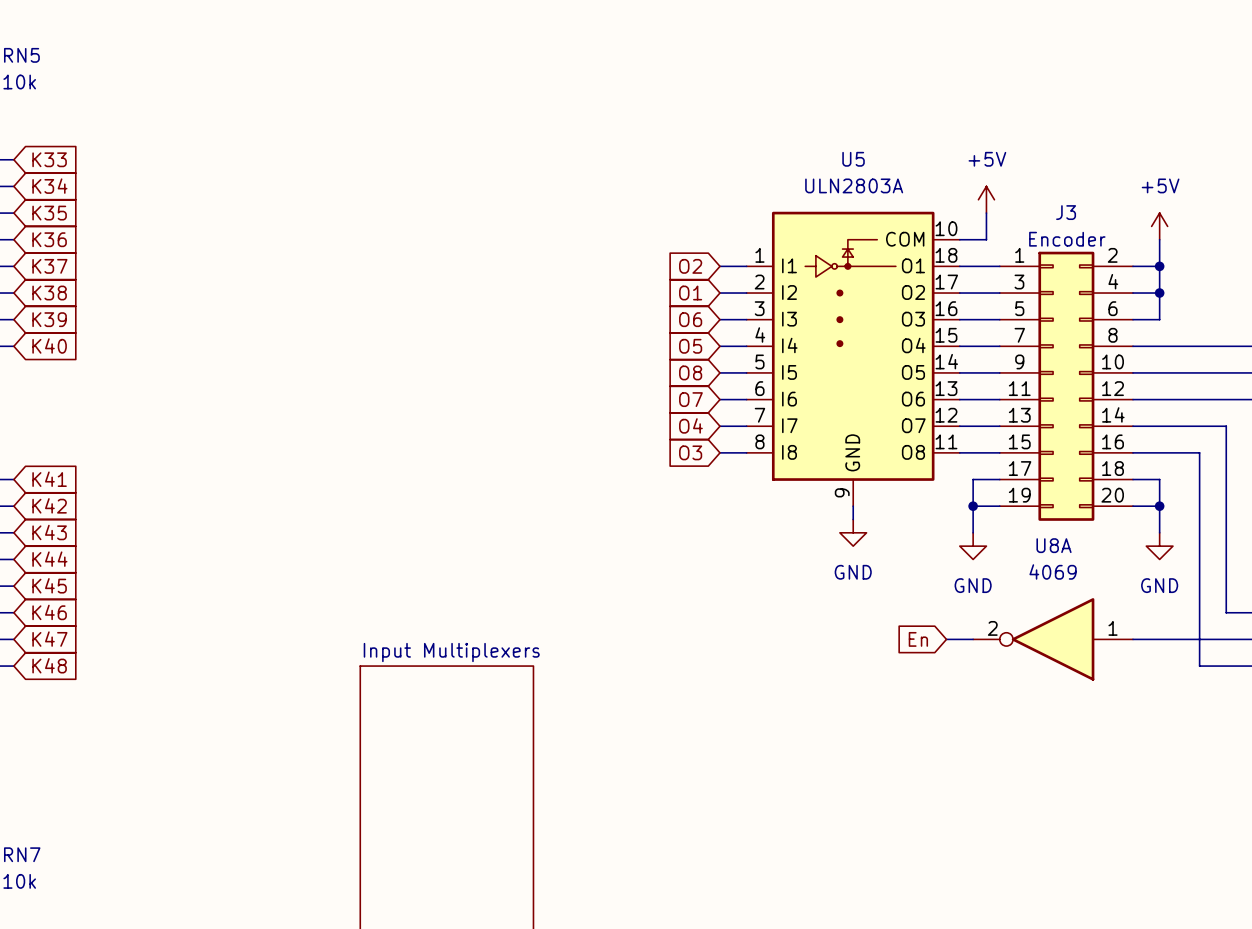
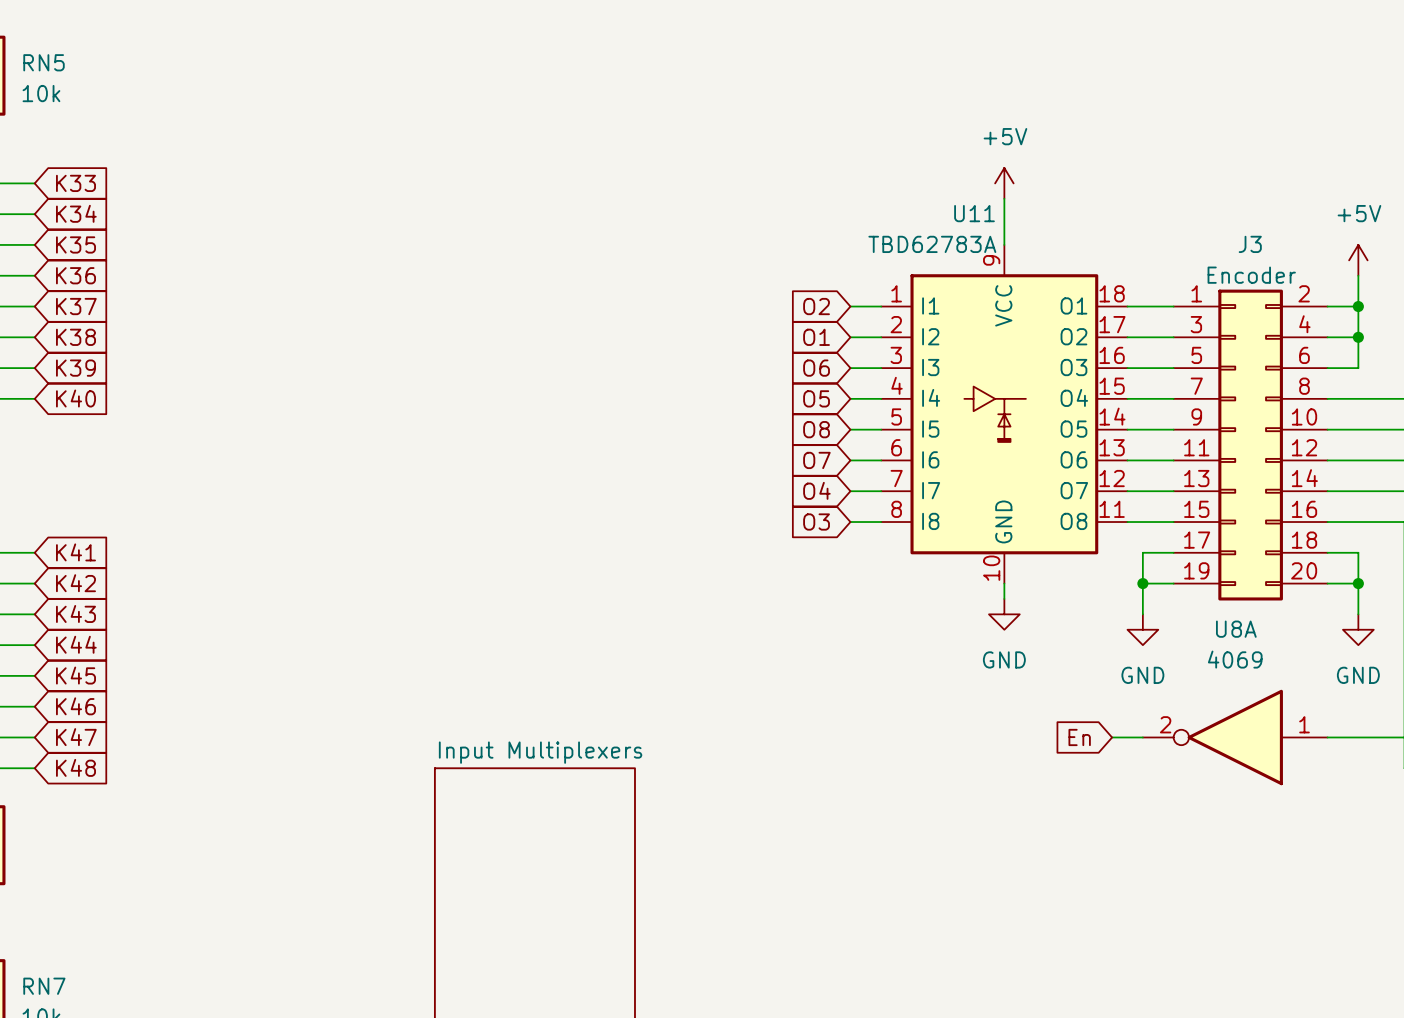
wire: none -> (1004, 198) (1004, 244)
power symbol position: +5V (986, 199) -> +5V (1004, 183)
wire: (986, 213) (986, 239) (959, 239) -> none
U5: ULN2803A (853, 358) -> none
U11: none -> TBD62783A (1004, 414)

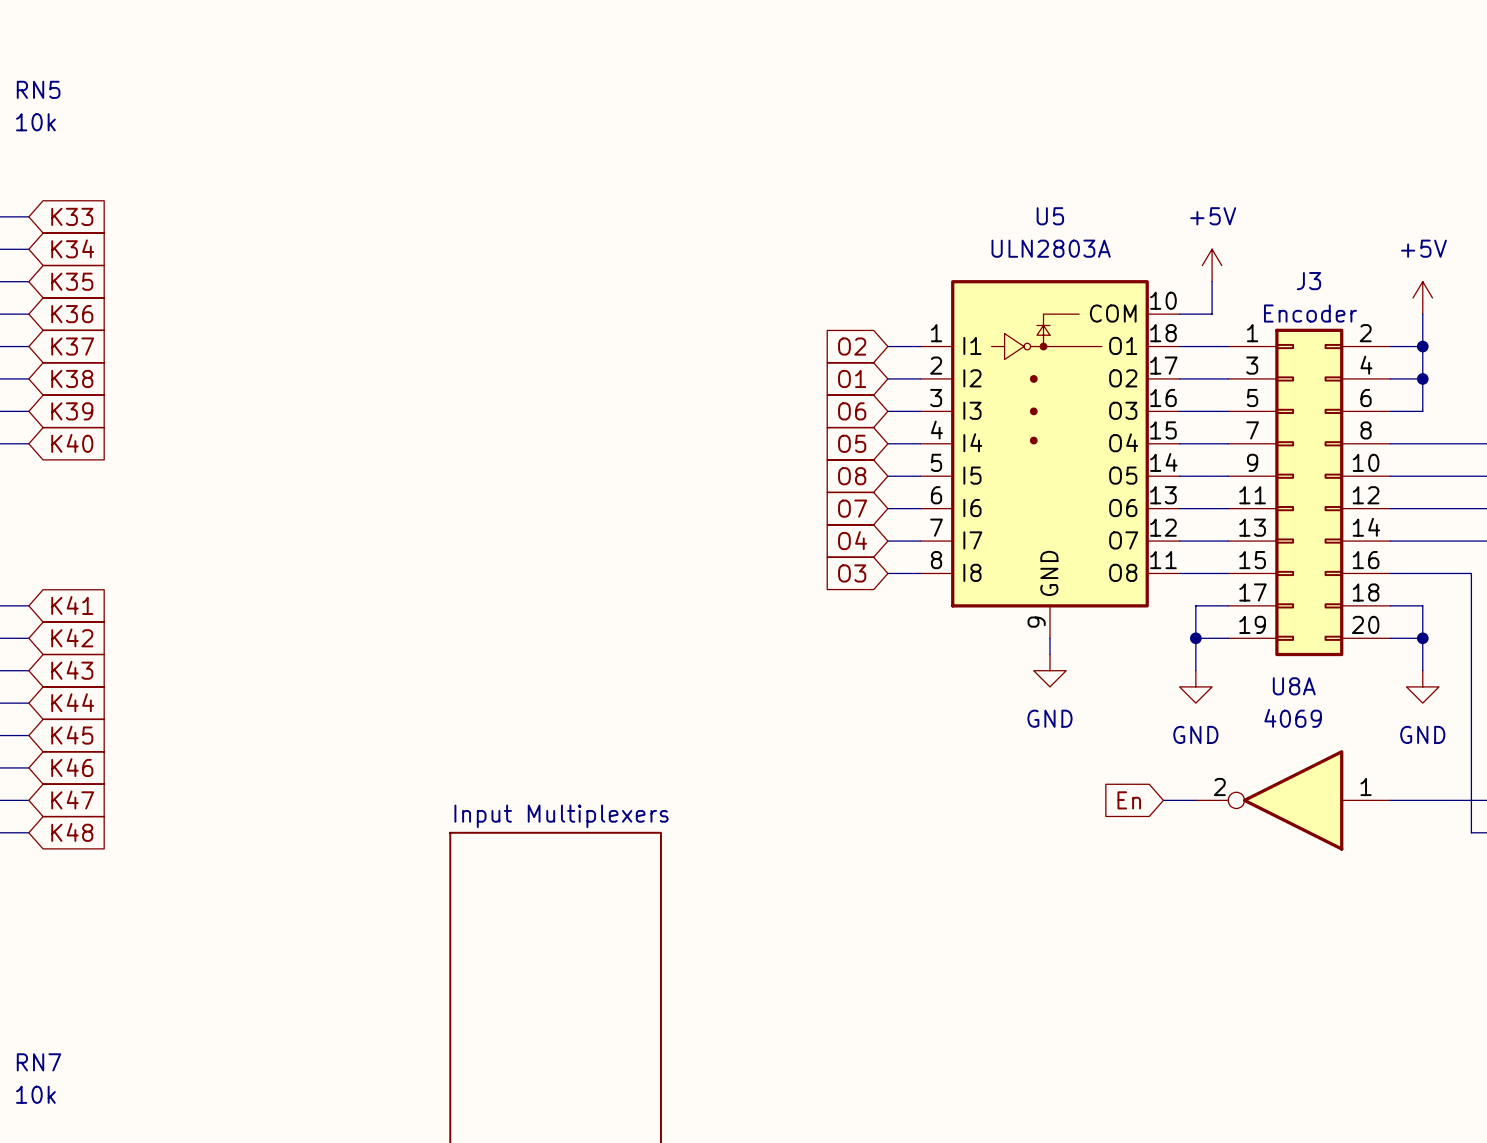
power symbol position: +5V (1004, 183) -> +5V (1212, 265)
wire: (1004, 198) (1004, 244) -> none
wire: none -> (1212, 281) (1212, 314) (1179, 314)
U5: none -> ULN2803A (1049, 459)
U11: TBD62783A (1004, 414) -> none

